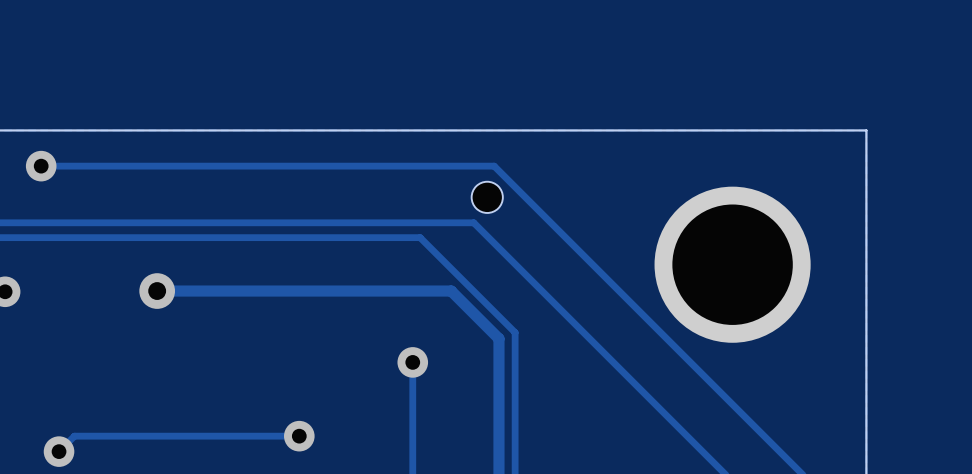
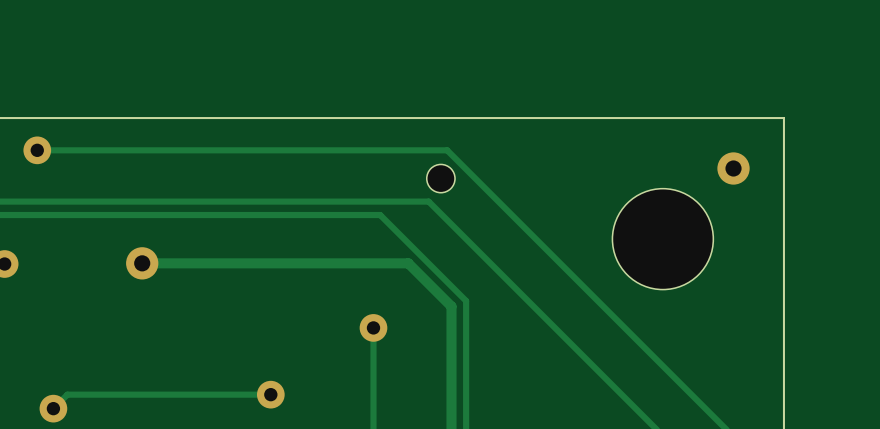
part footprint: [654, 186, 811, 343] -> [612, 188, 714, 290]
via: none -> (733, 168)

